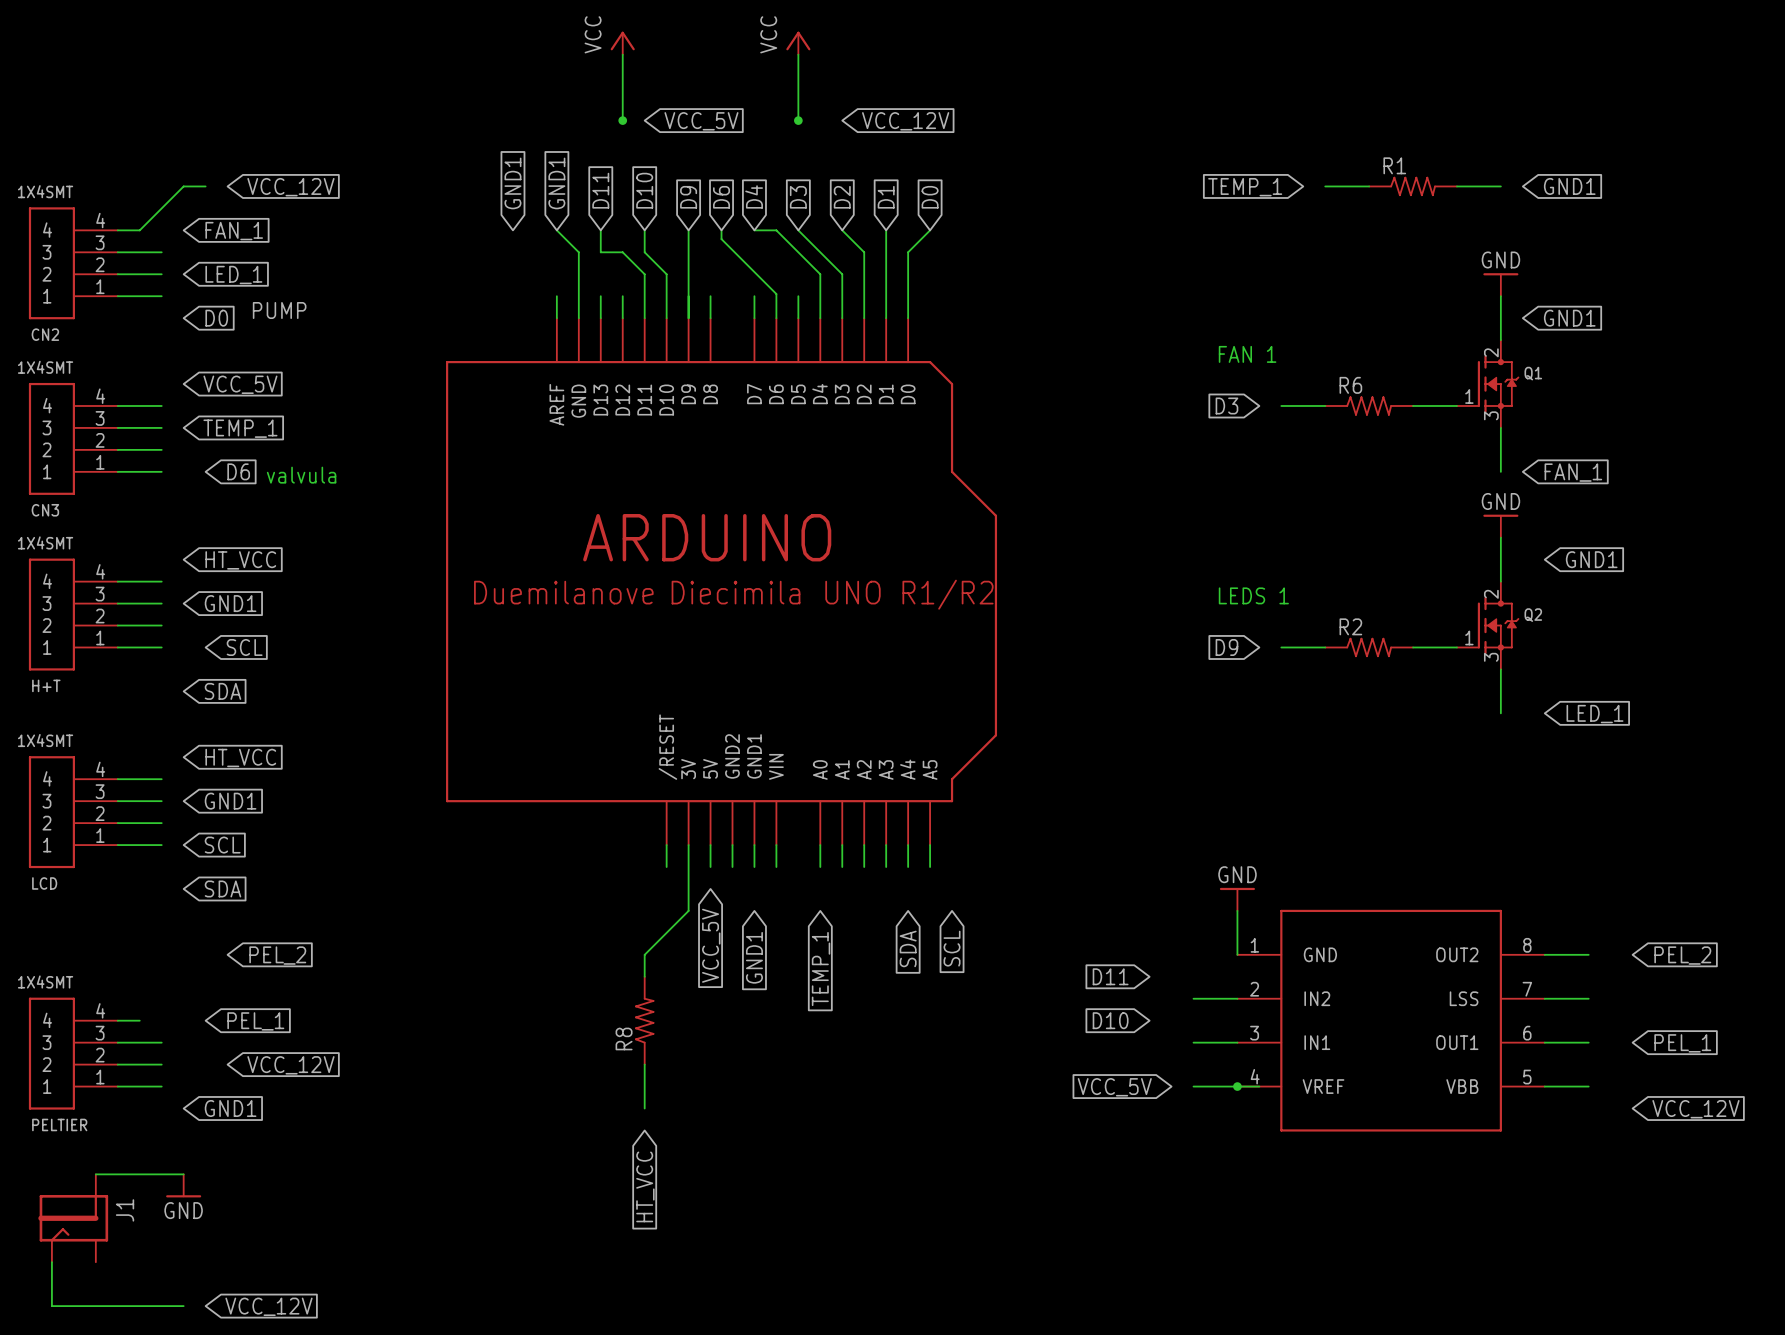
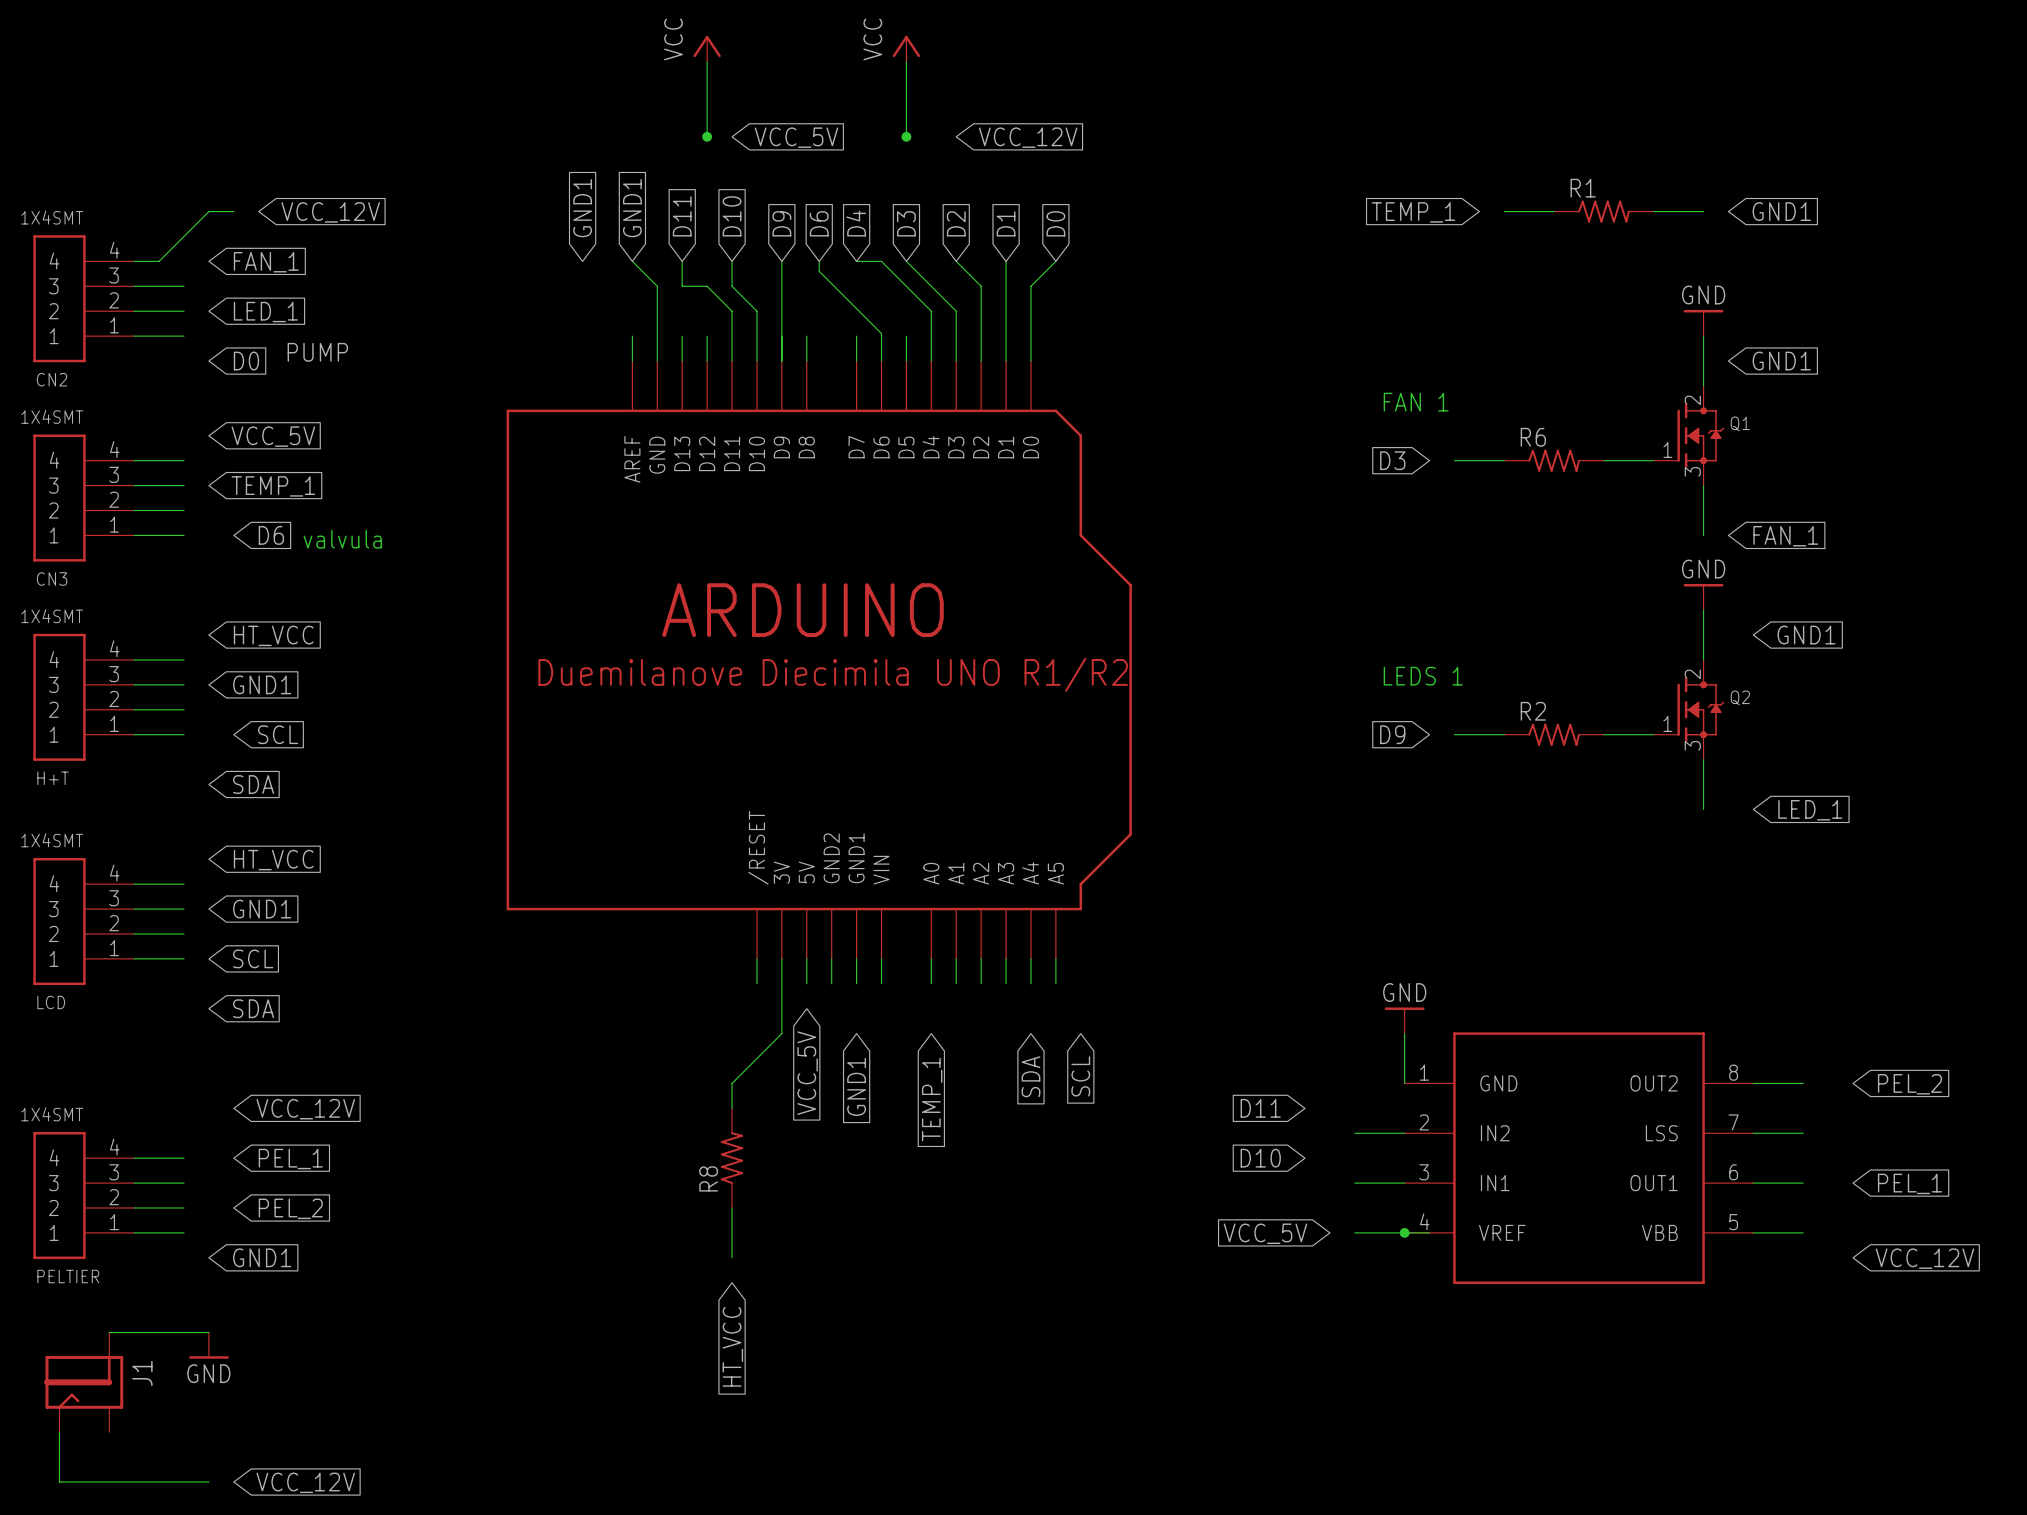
global label position: PEL_2 (277, 955) -> PEL_2 (290, 1208)
wire: none -> (159, 1158) (184, 1158)
global label position: VCC_12V (290, 1065) -> VCC_12V (305, 1109)

